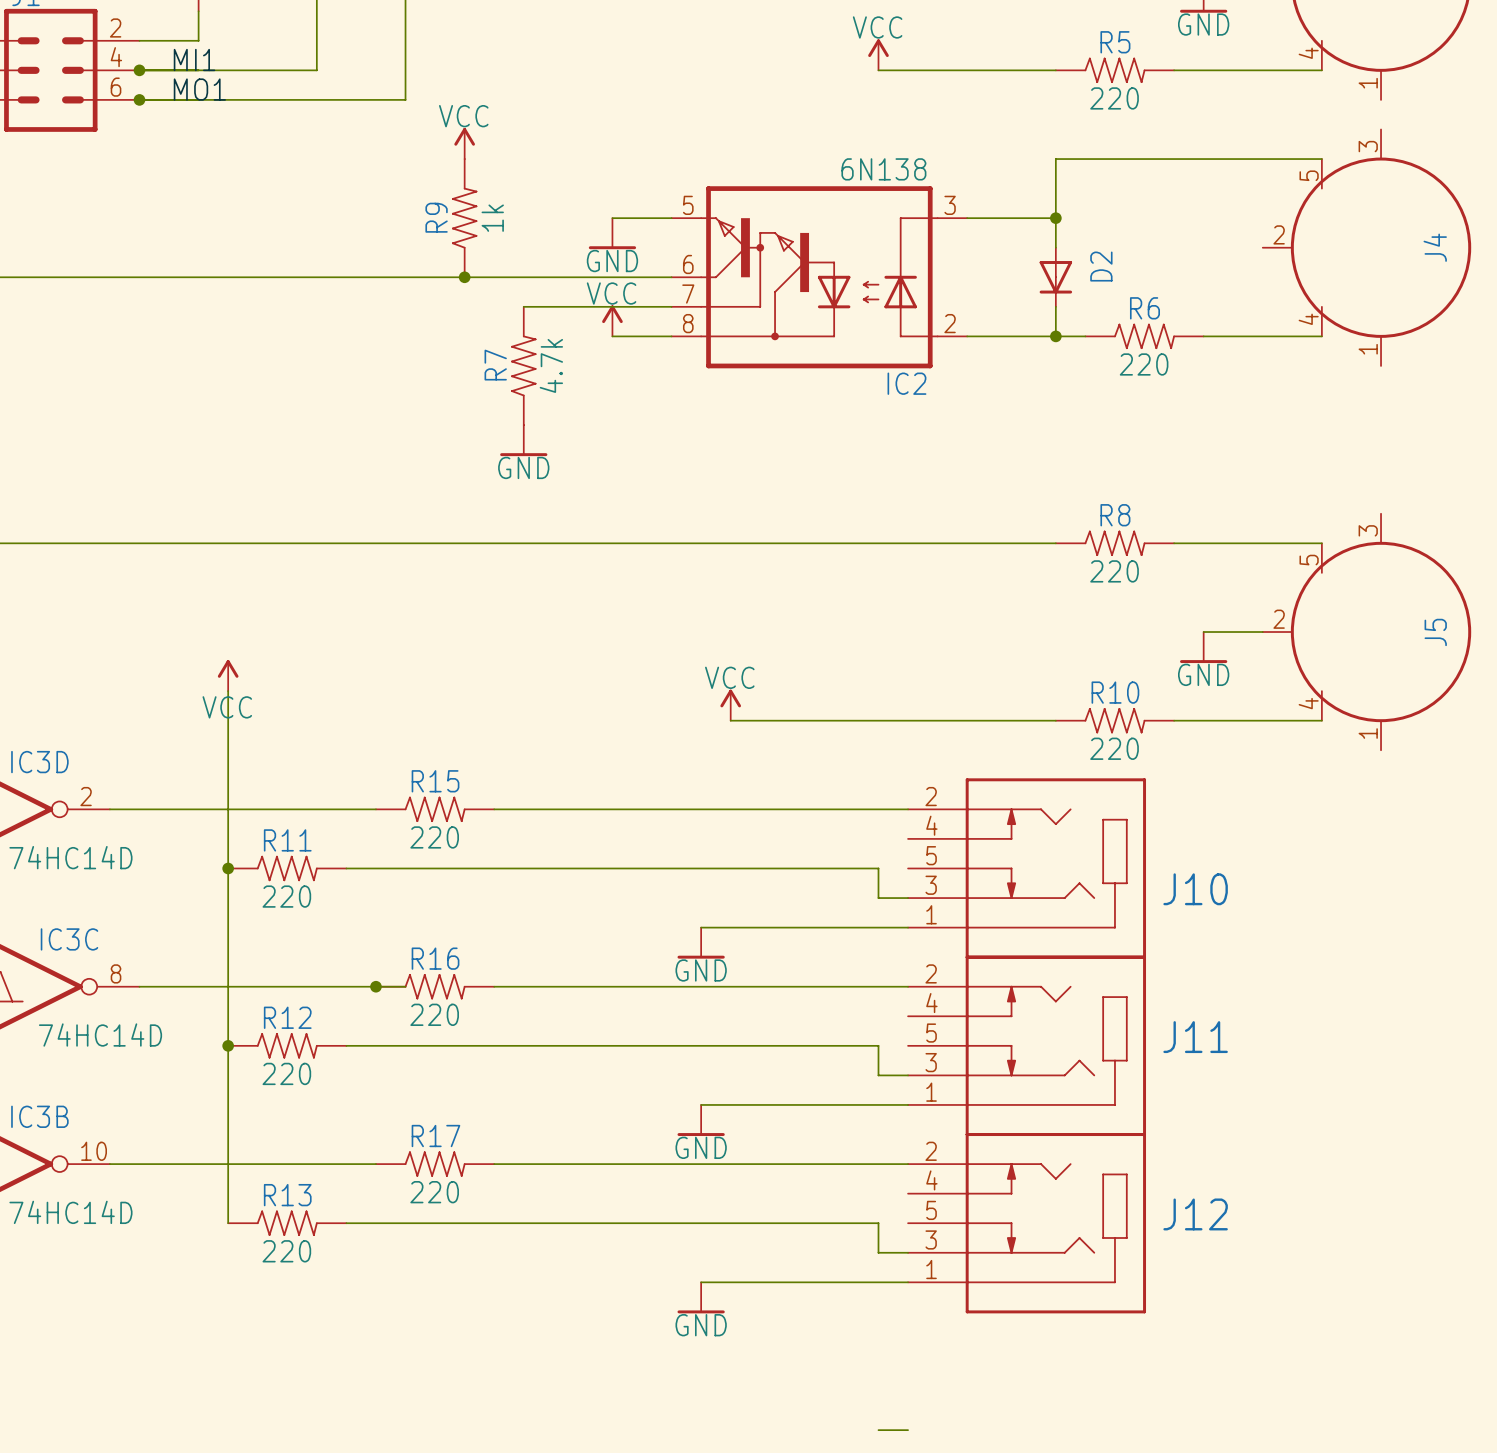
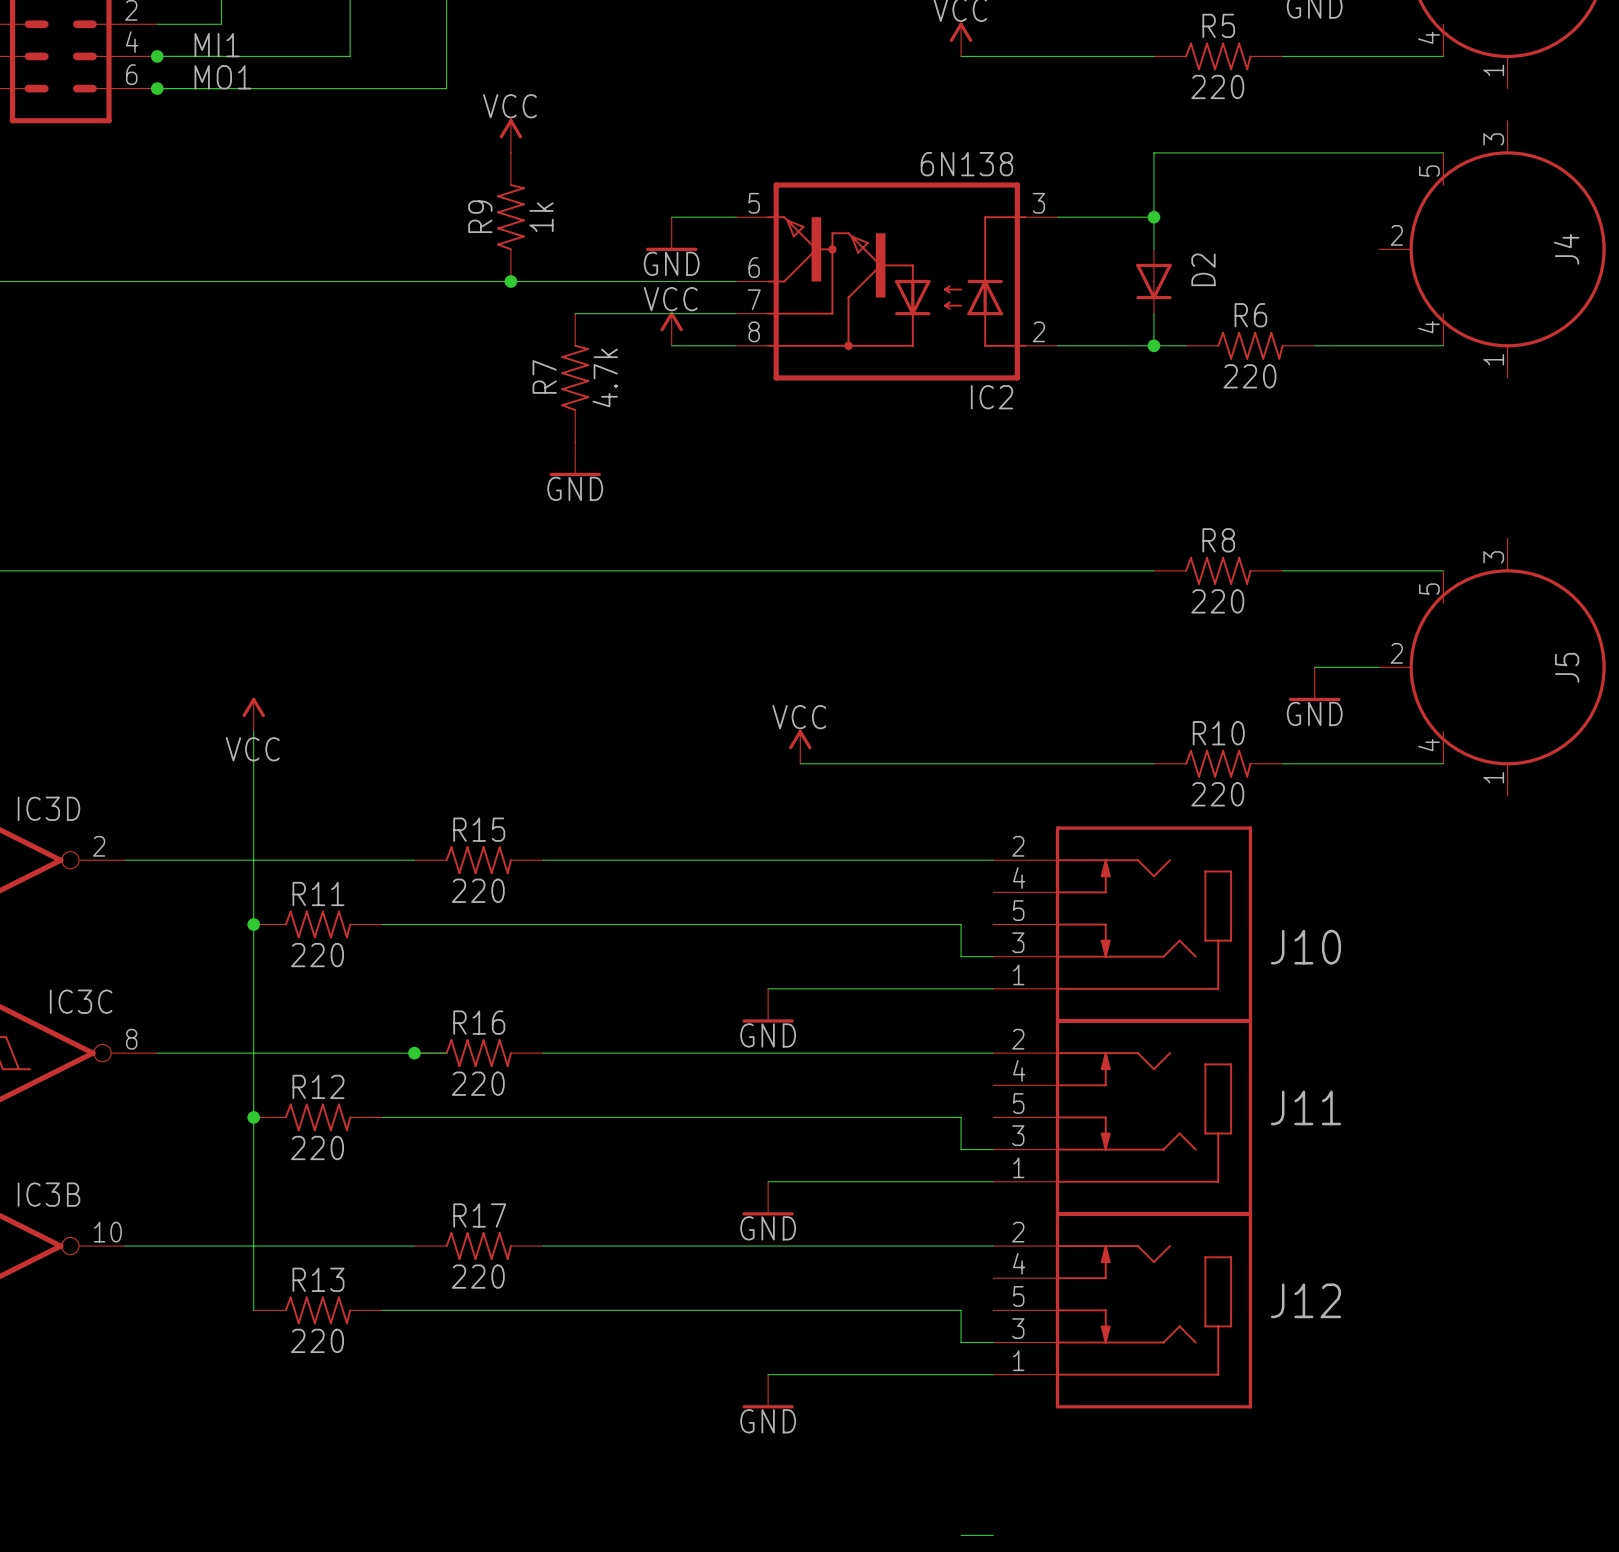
IC3D value: 74HC14D (70, 857) -> none
IC3C value: 74HC14D (100, 1035) -> none
IC3B value: 74HC14D (70, 1212) -> none

